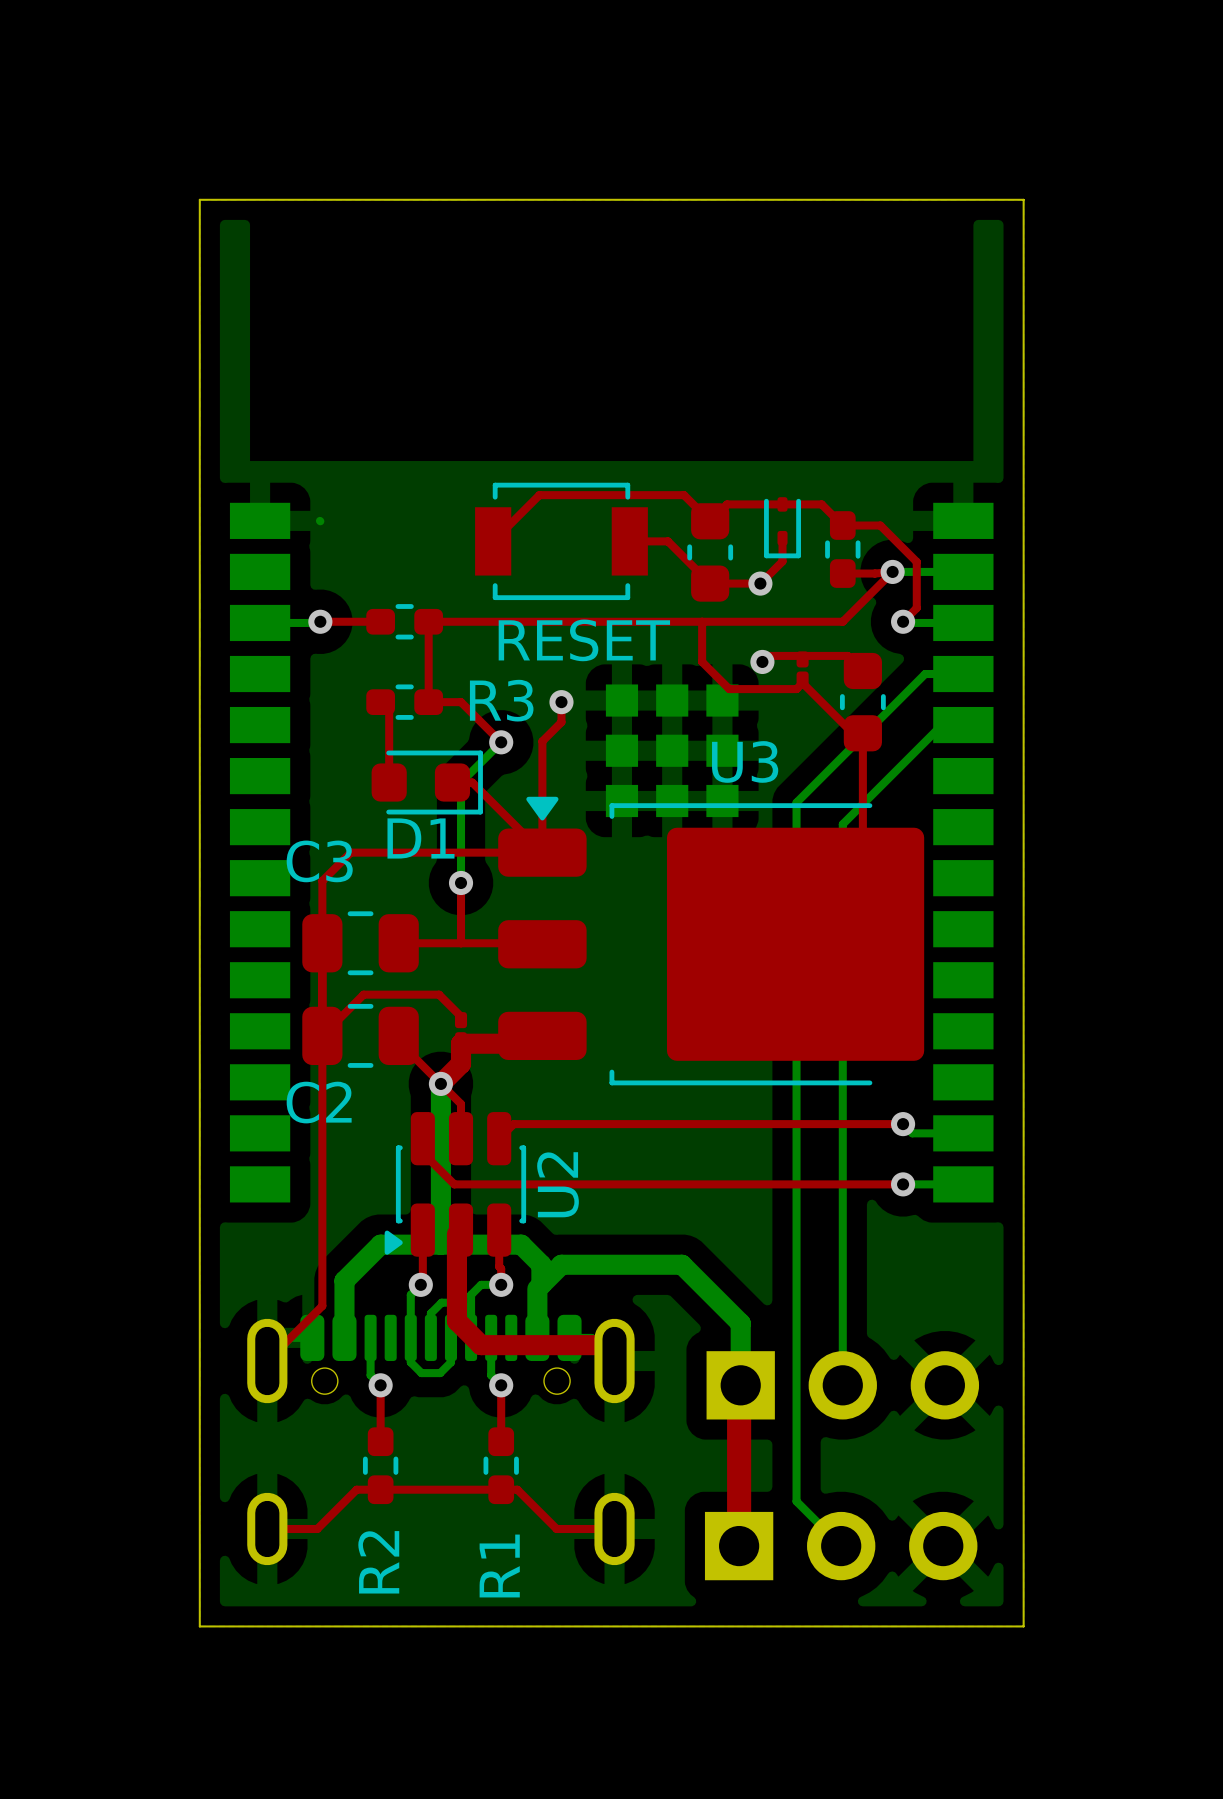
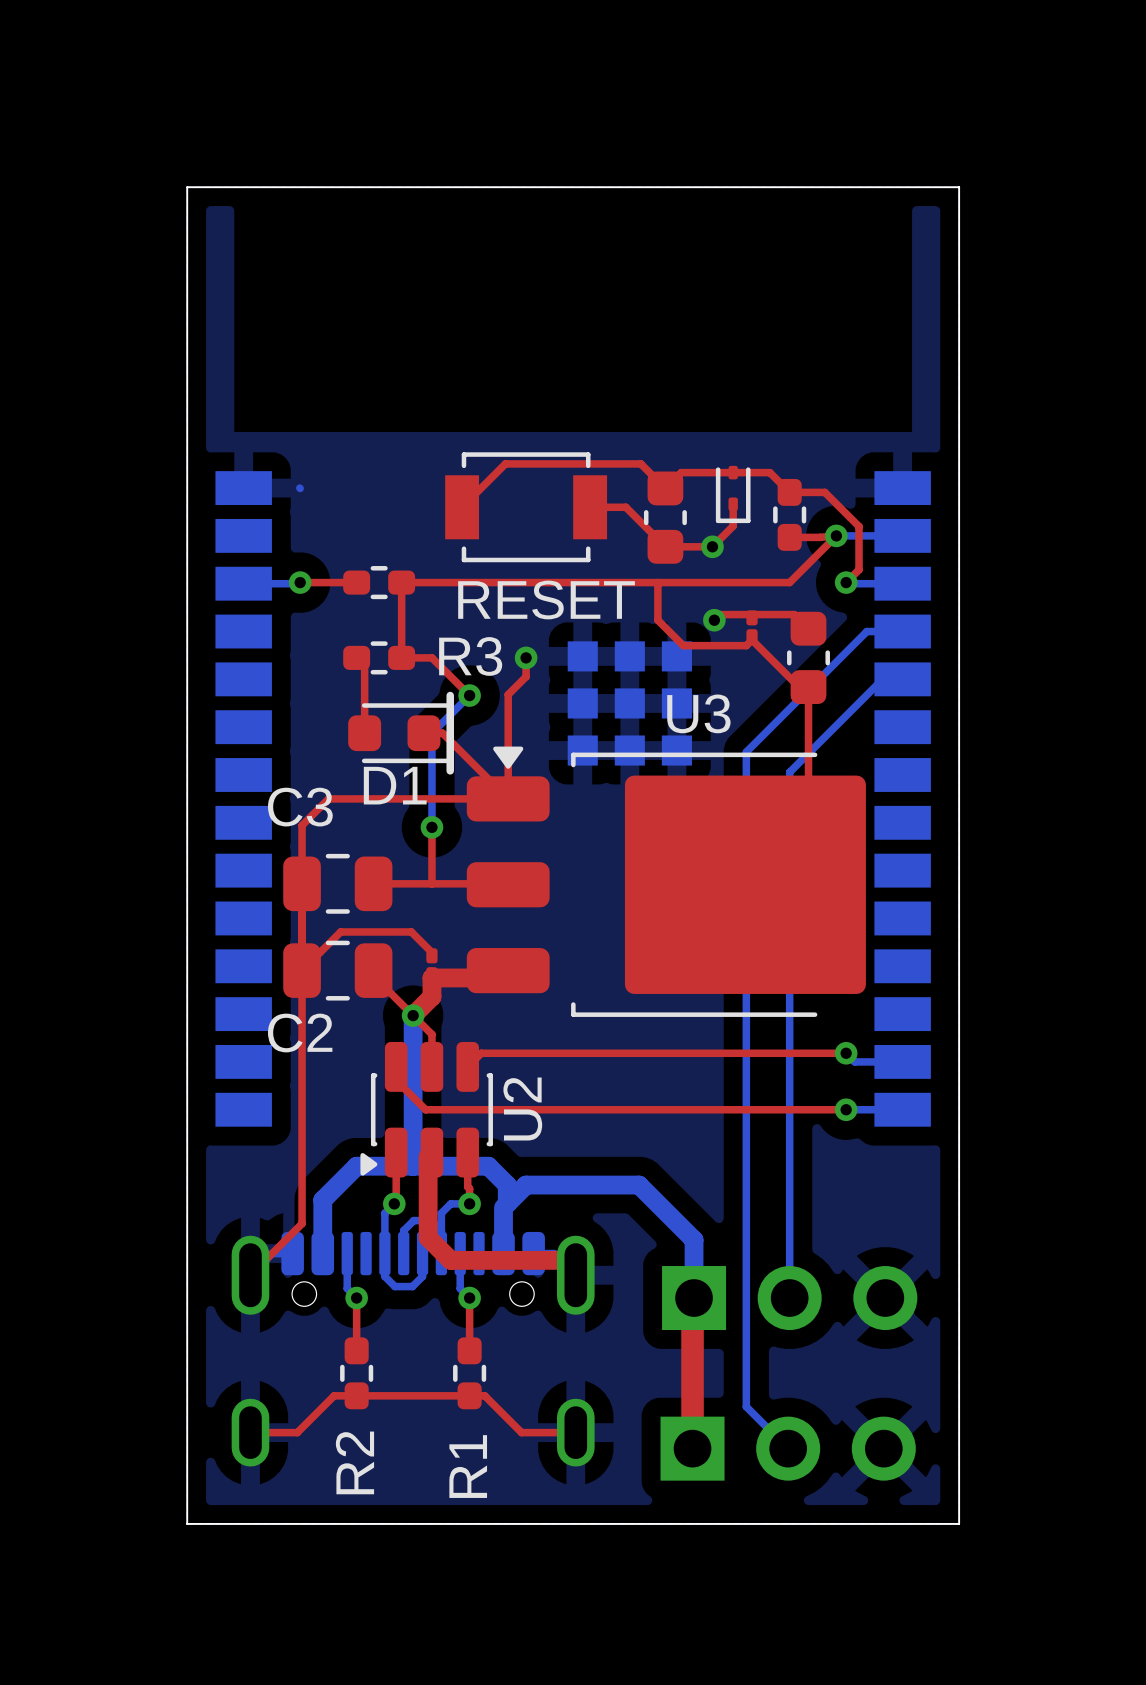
D1 footprint: [371, 750, 483, 815] -> [348, 691, 454, 775]

